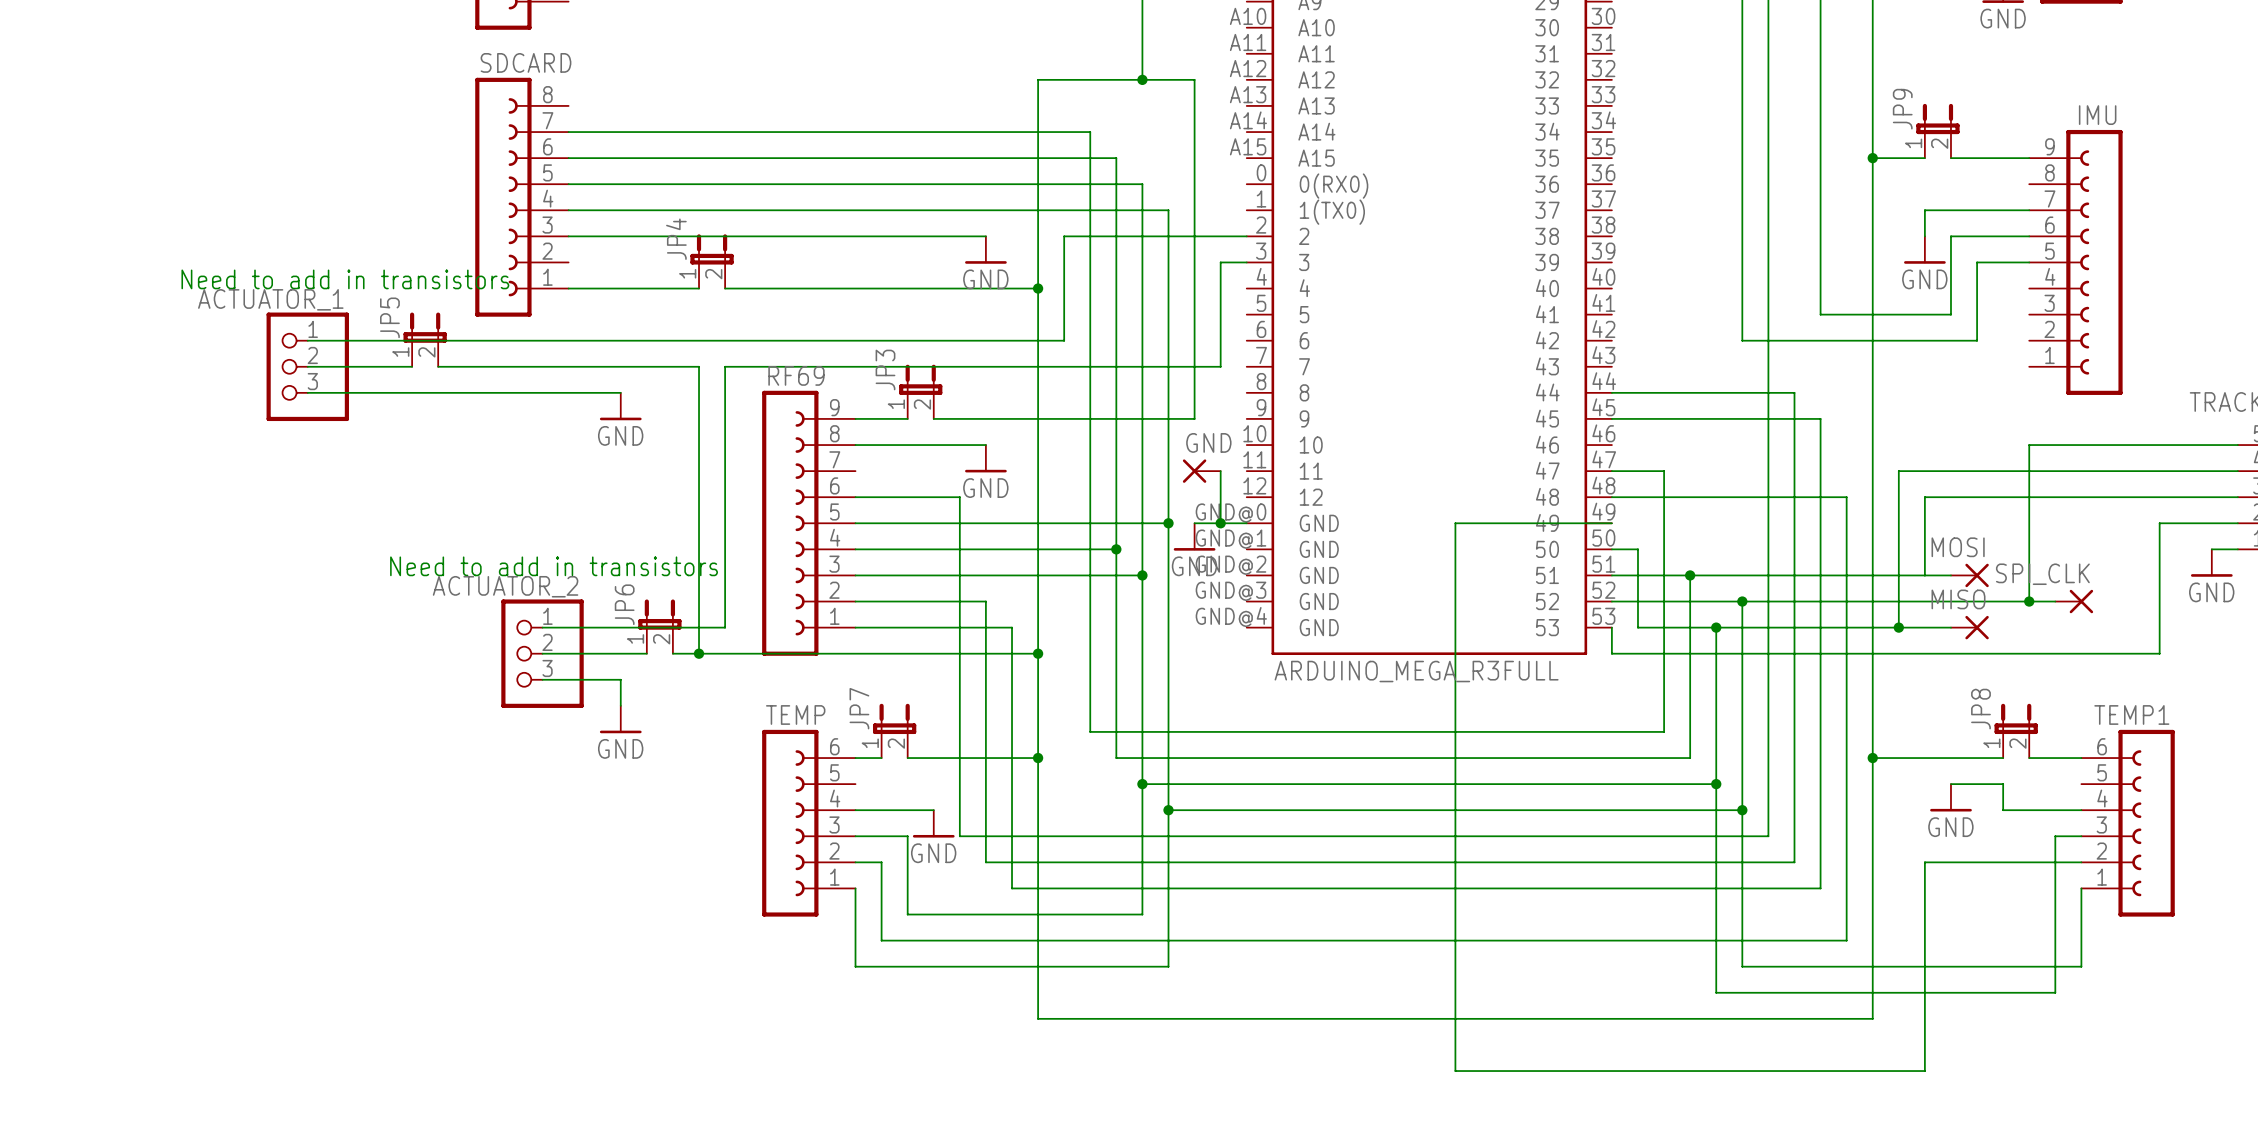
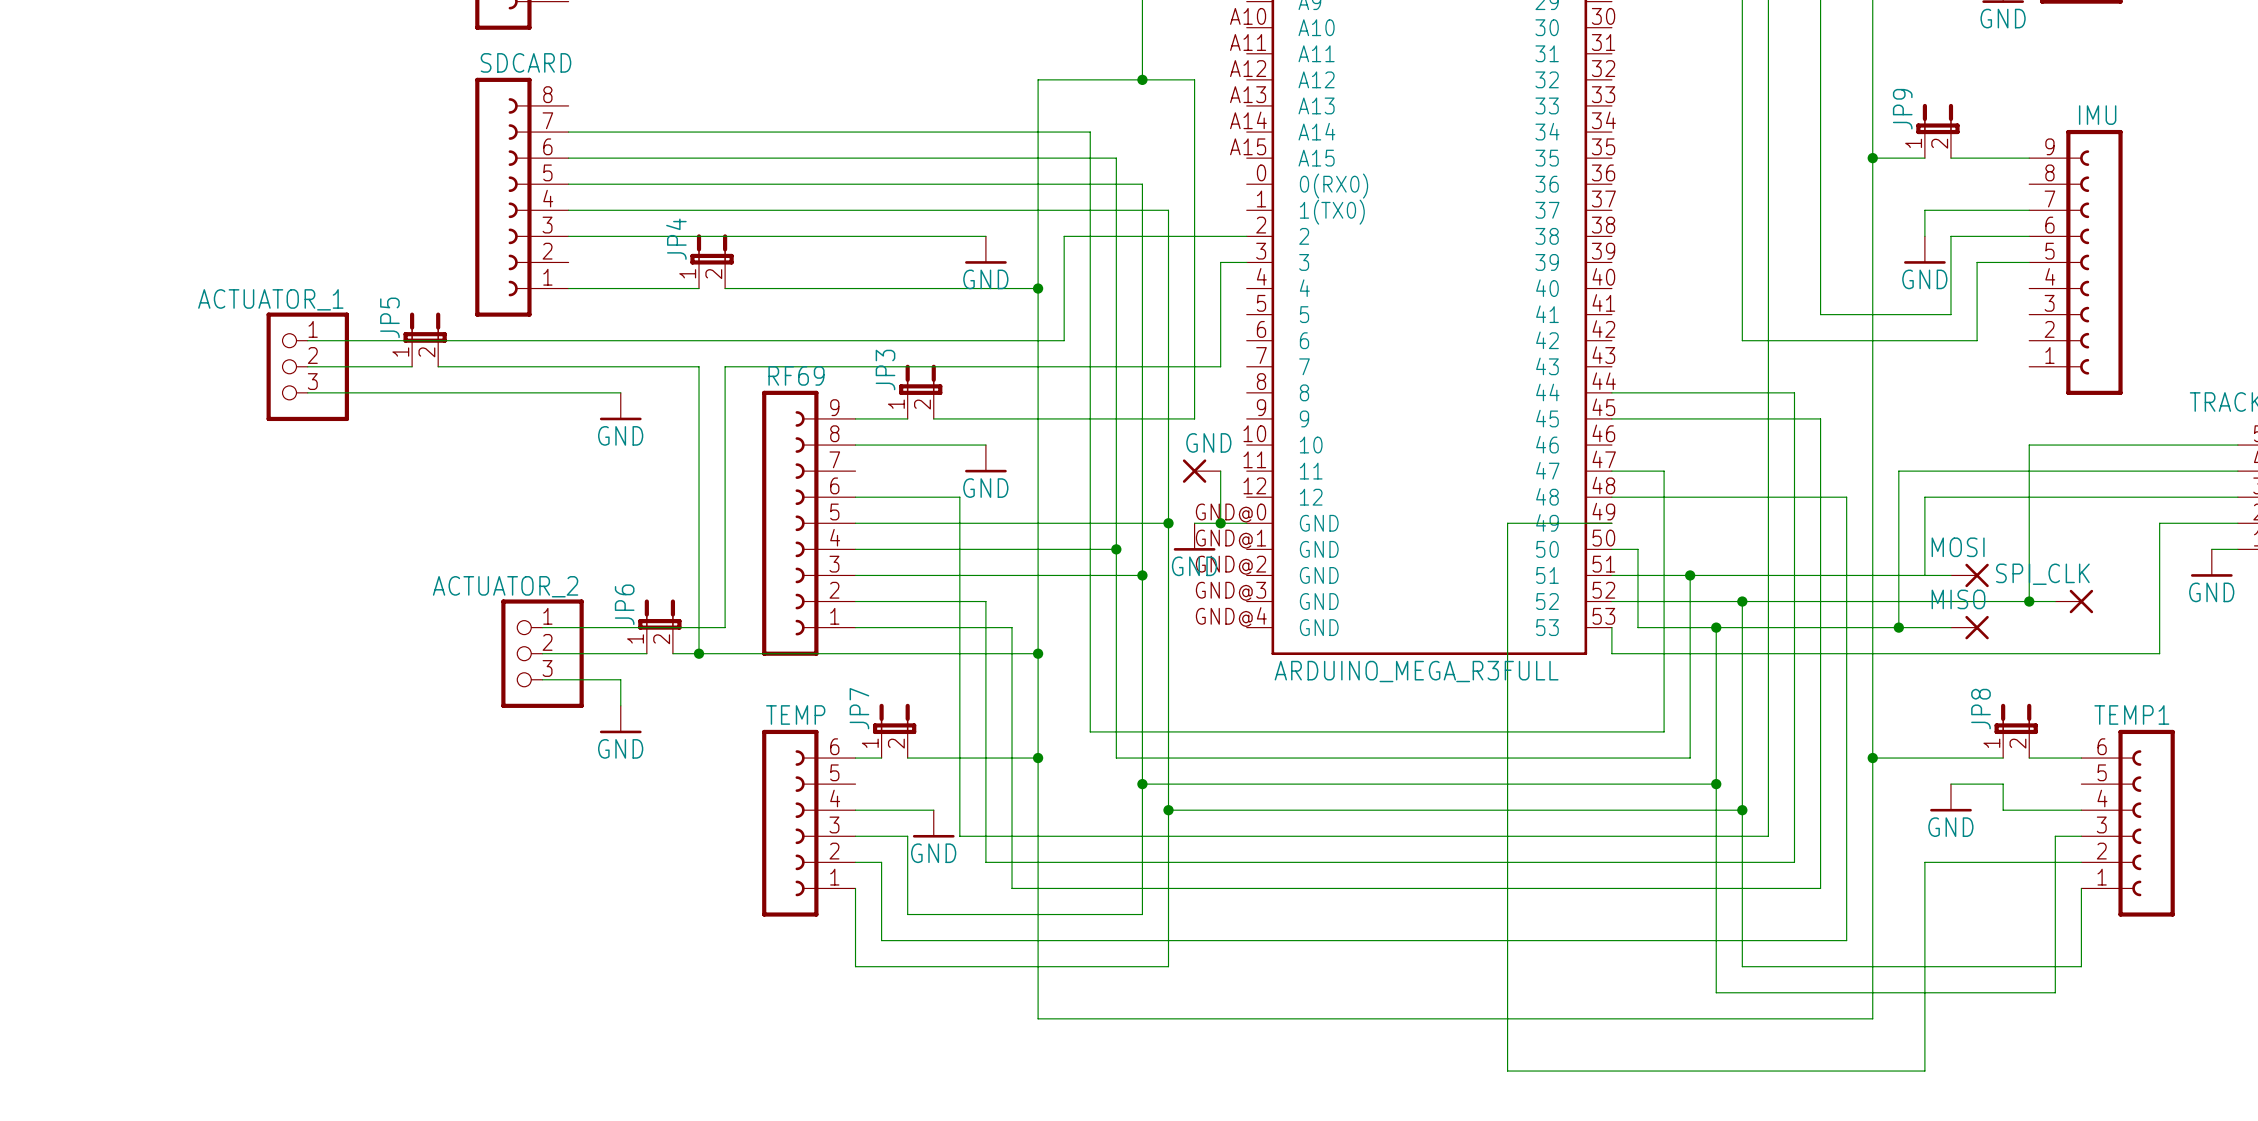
text: Need to add in transistors (345, 279) -> none
wire: (1507, 523) (1455, 523) (1455, 1071) (1507, 1071) -> (1507, 523) (1507, 1071)
text: Need to add in transistors (554, 566) -> none

